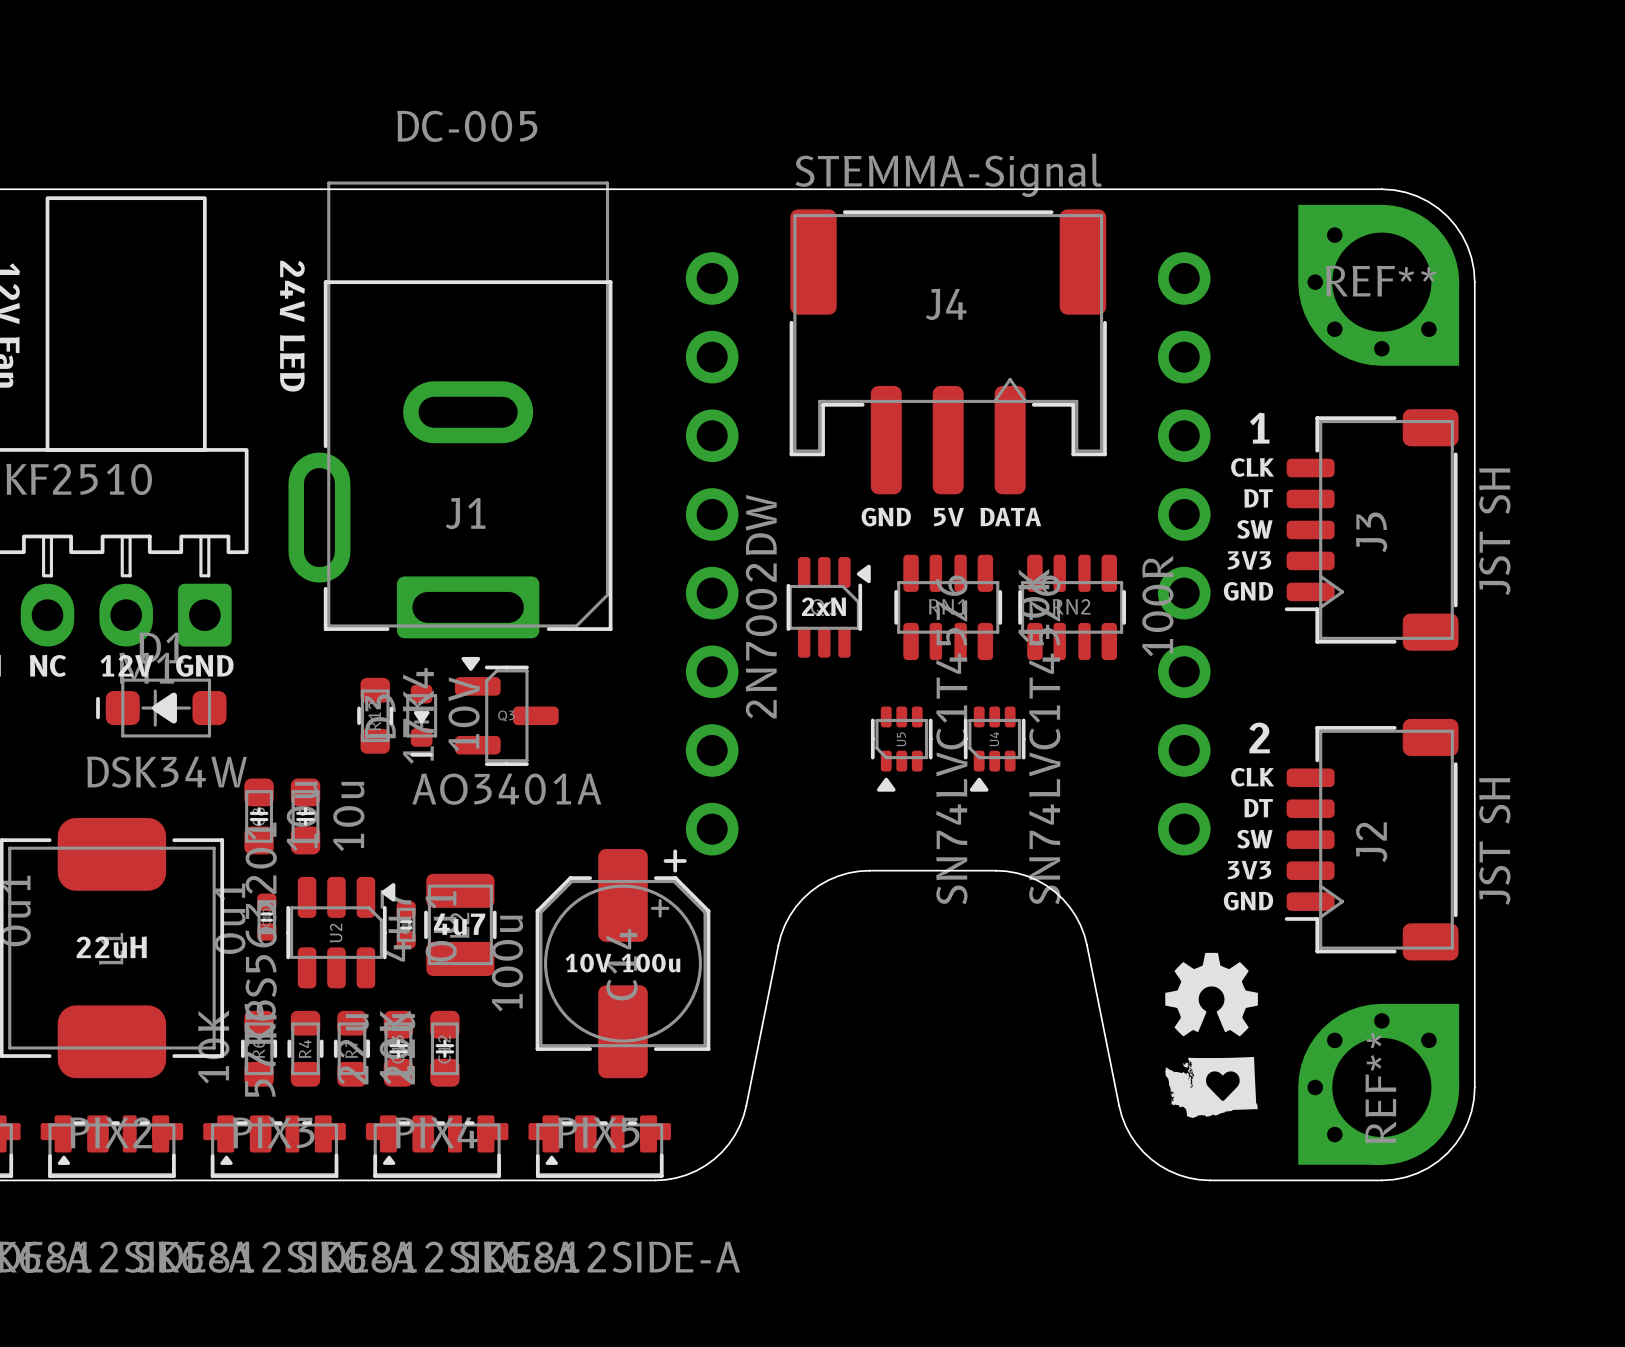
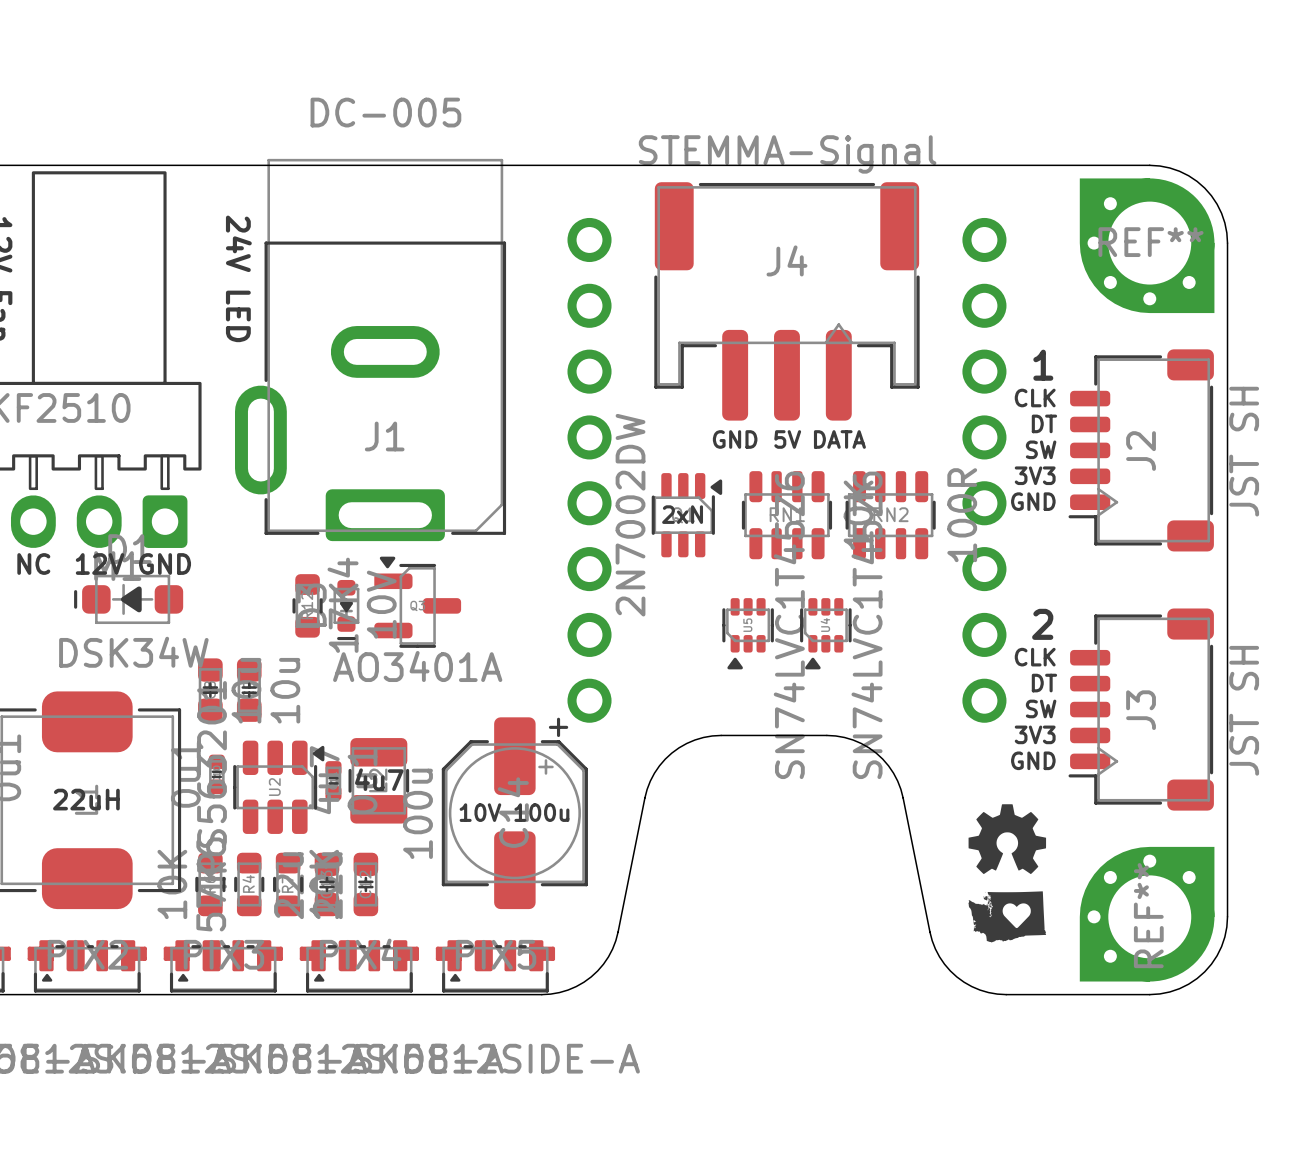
J3 name: J3 (1371, 532) -> J2 (1141, 451)
J2 name: J2 (1371, 842) -> J3 (1141, 710)

